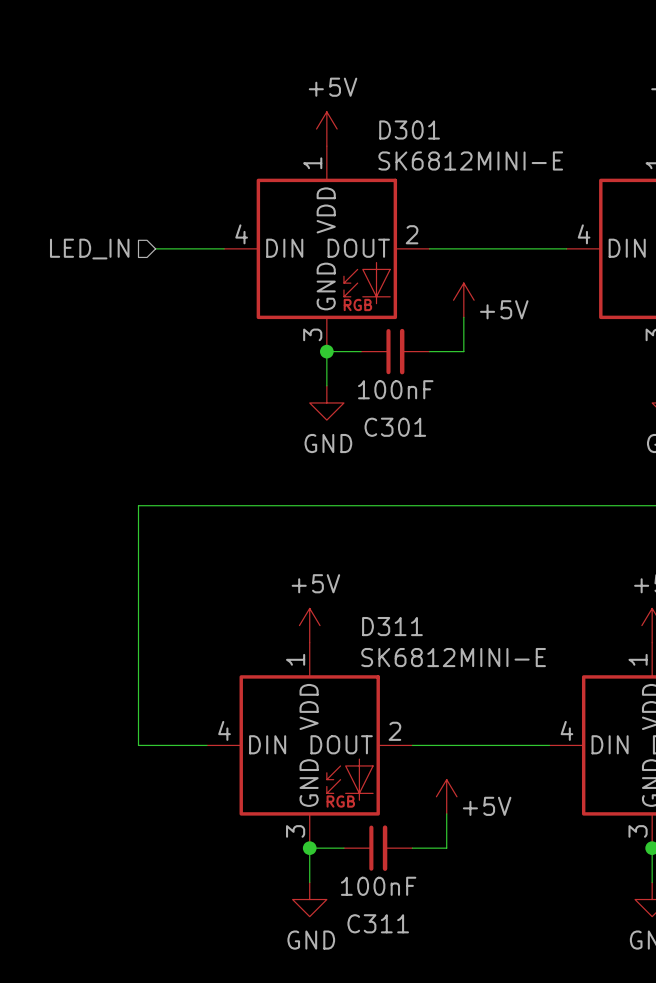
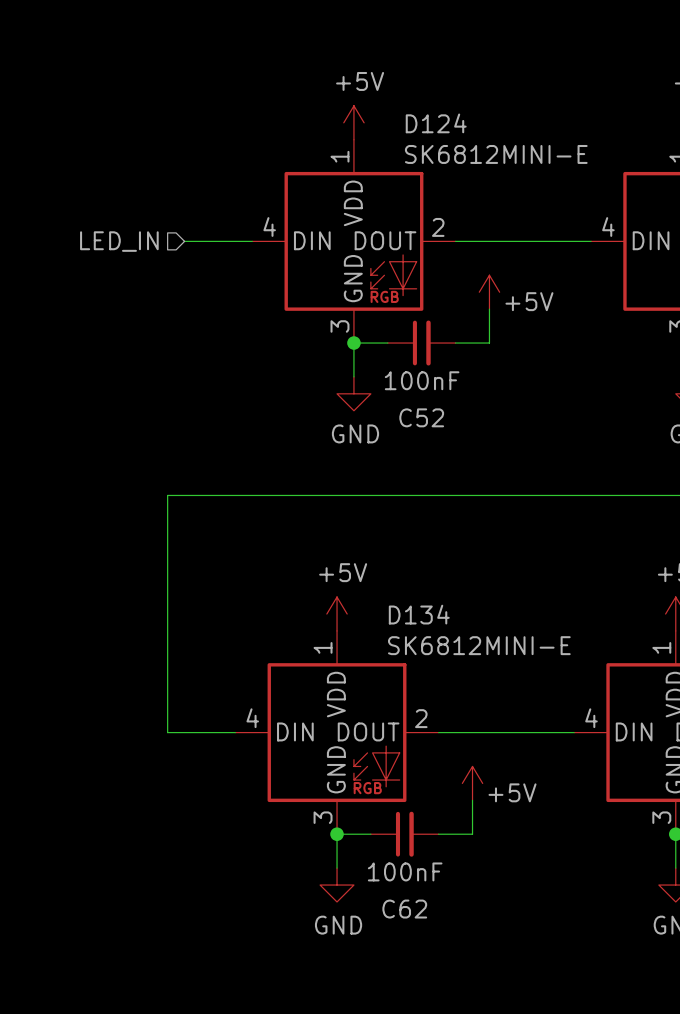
D301 name: D301 (409, 130) -> D124 (436, 123)
C301 name: C301 (395, 427) -> C52 (421, 417)
D311 name: D311 (392, 626) -> D134 (419, 614)
C311 name: C311 (378, 923) -> C62 (404, 909)

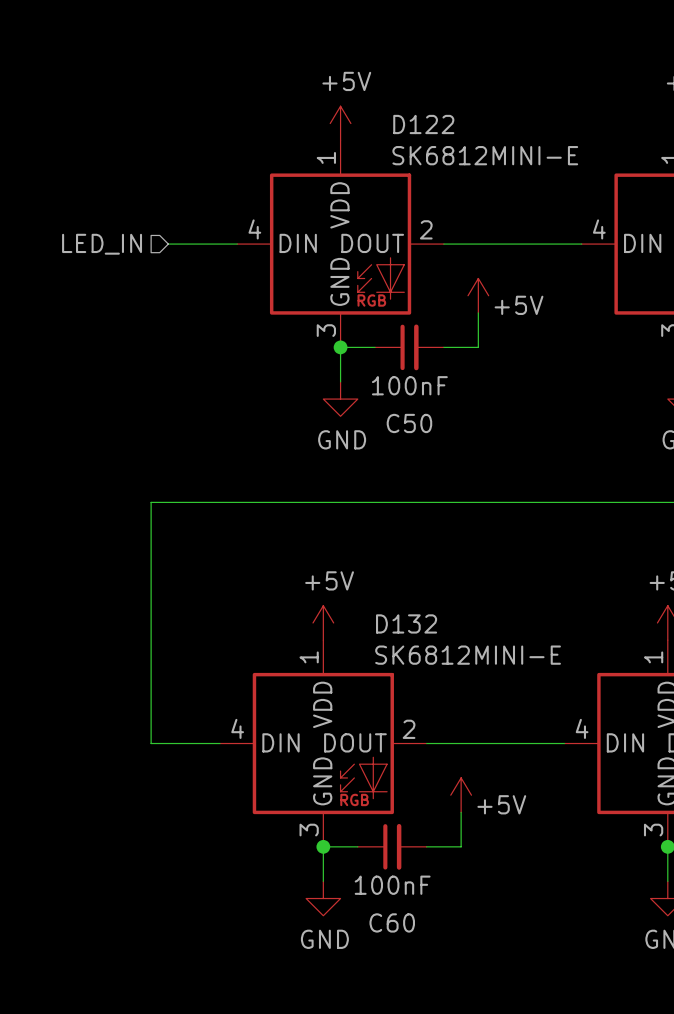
D124 name: D124 (436, 123) -> D122 (423, 124)
C52 name: C52 (421, 417) -> C50 (409, 423)
D134 name: D134 (419, 614) -> D132 (406, 623)
C62 name: C62 (404, 909) -> C60 (392, 922)

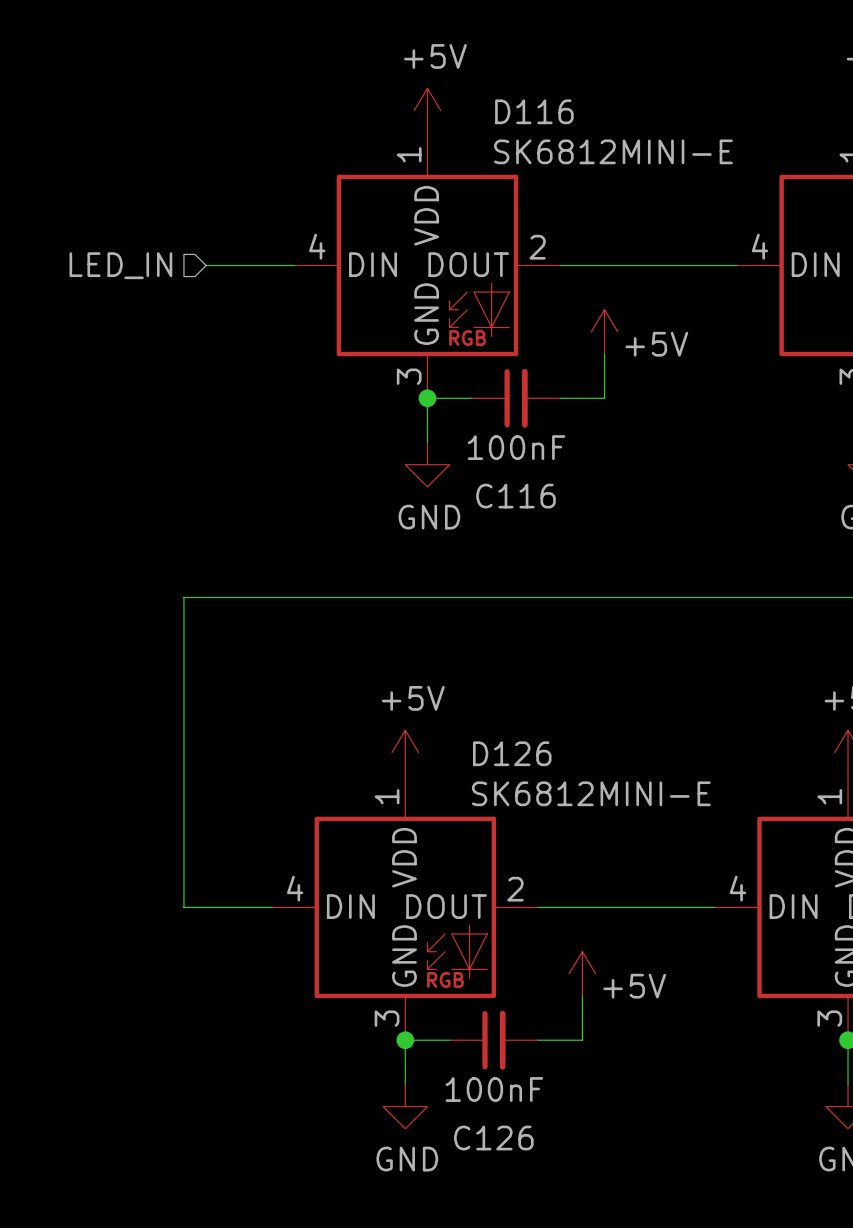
D122 name: D122 (423, 124) -> D116 (534, 111)
C50 name: C50 (409, 423) -> C116 (515, 496)
D132 name: D132 (406, 623) -> D126 (512, 753)
C60 name: C60 (392, 922) -> C126 (493, 1138)

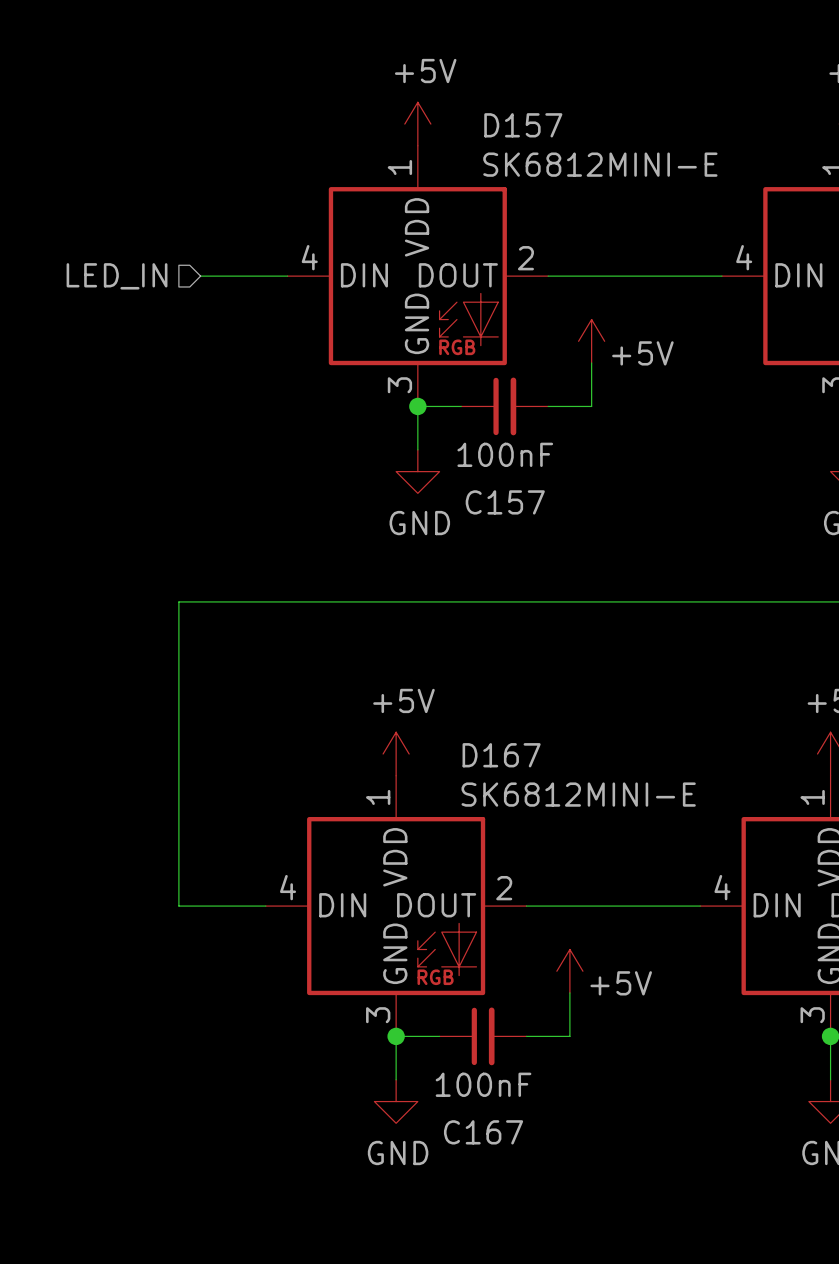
D116 name: D116 (534, 111) -> D157 (523, 125)
C116 name: C116 (515, 496) -> C157 (505, 502)
D126 name: D126 (512, 753) -> D167 (501, 755)
C126 name: C126 (493, 1138) -> C167 (483, 1132)

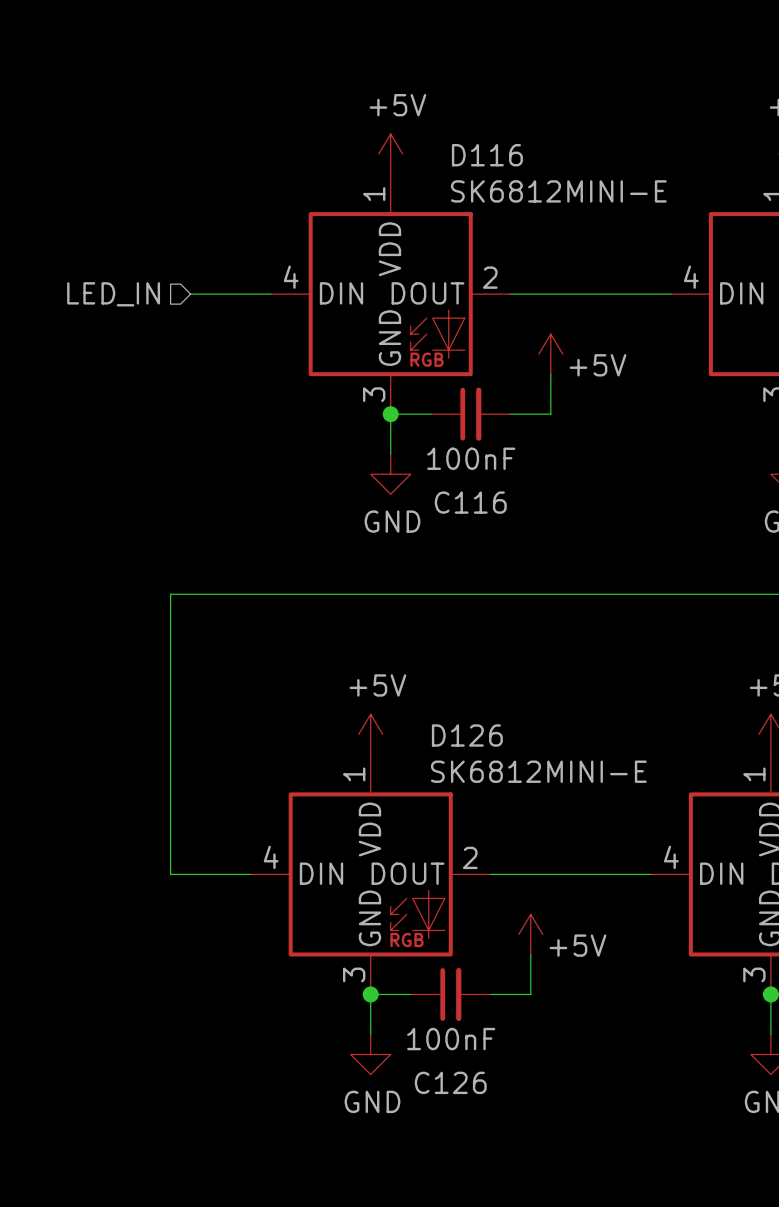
D157 name: D157 (523, 125) -> D116 (487, 155)
C157 name: C157 (505, 502) -> C116 (470, 502)
D167 name: D167 (501, 755) -> D126 (467, 735)
C167 name: C167 (483, 1132) -> C126 (450, 1082)

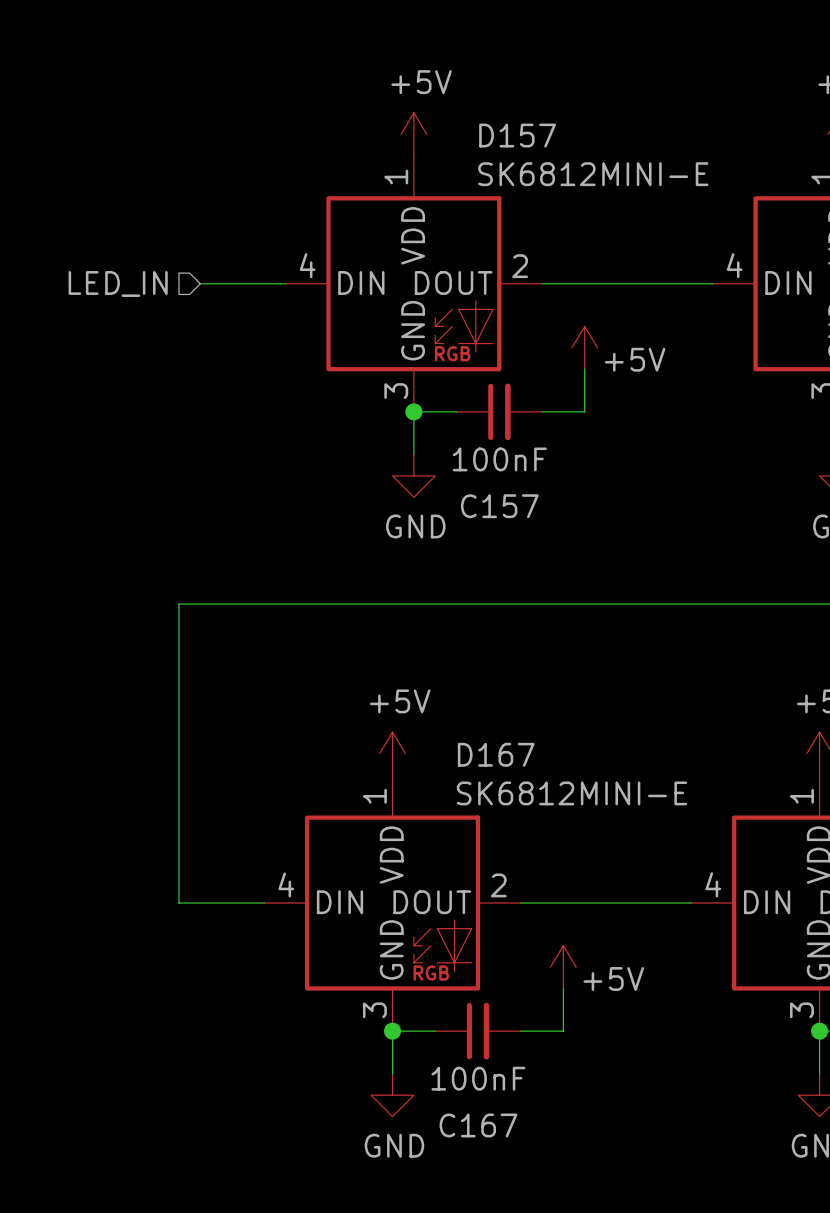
D116 name: D116 (487, 155) -> D157 (517, 135)
C116 name: C116 (470, 502) -> C157 (499, 506)
D126 name: D126 (467, 735) -> D167 (496, 754)
C126 name: C126 (450, 1082) -> C167 (478, 1125)

